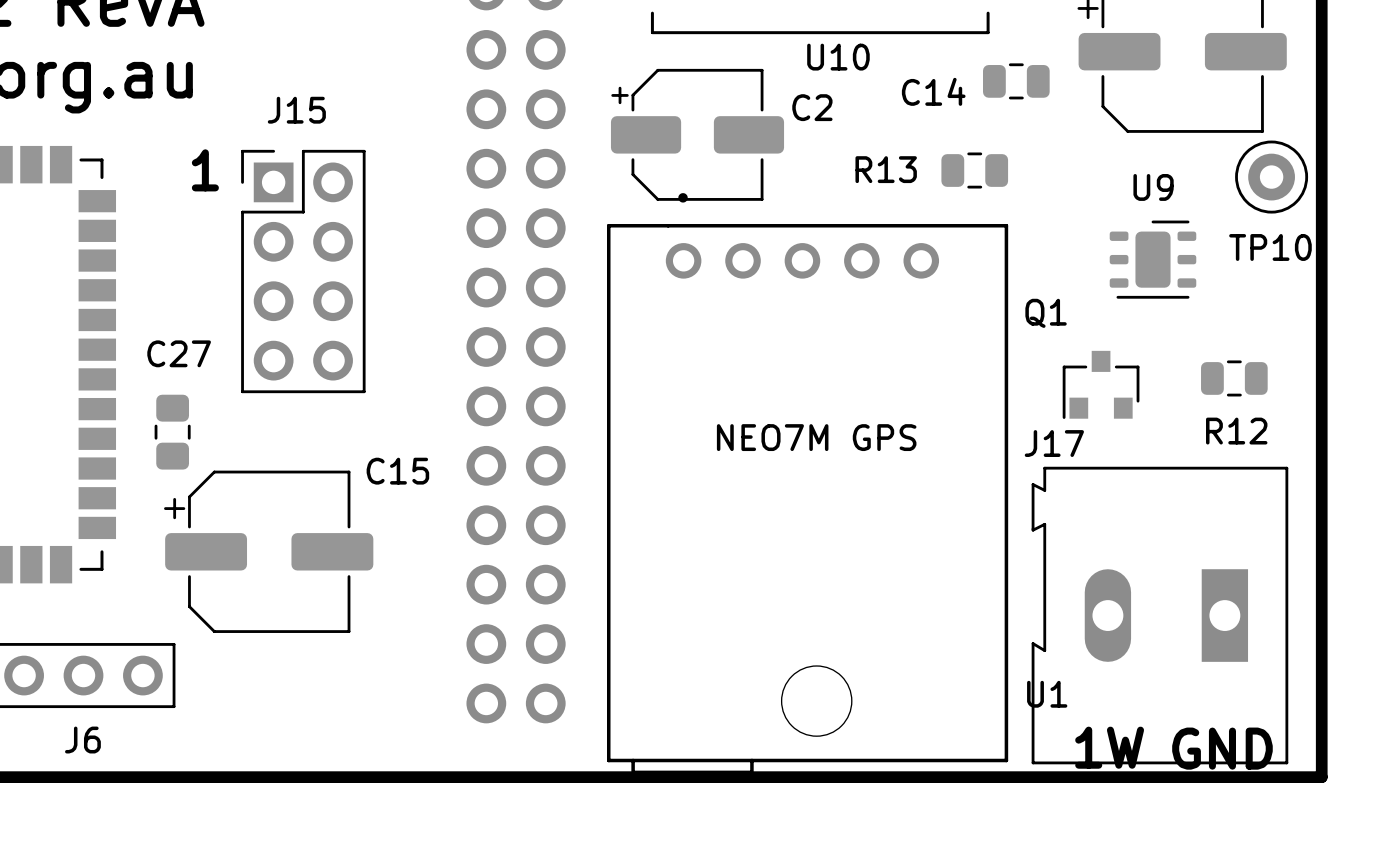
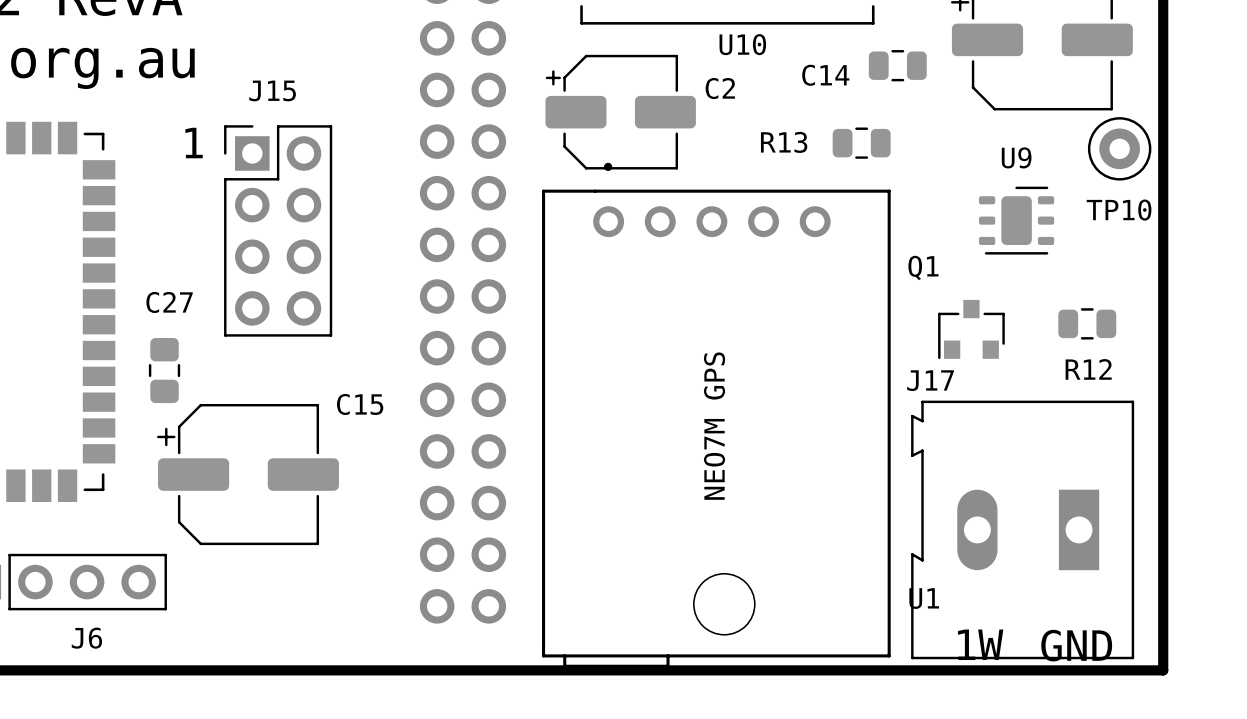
U1 text rotation: 0° (816, 437) -> 90° counterclockwise (714, 426)

